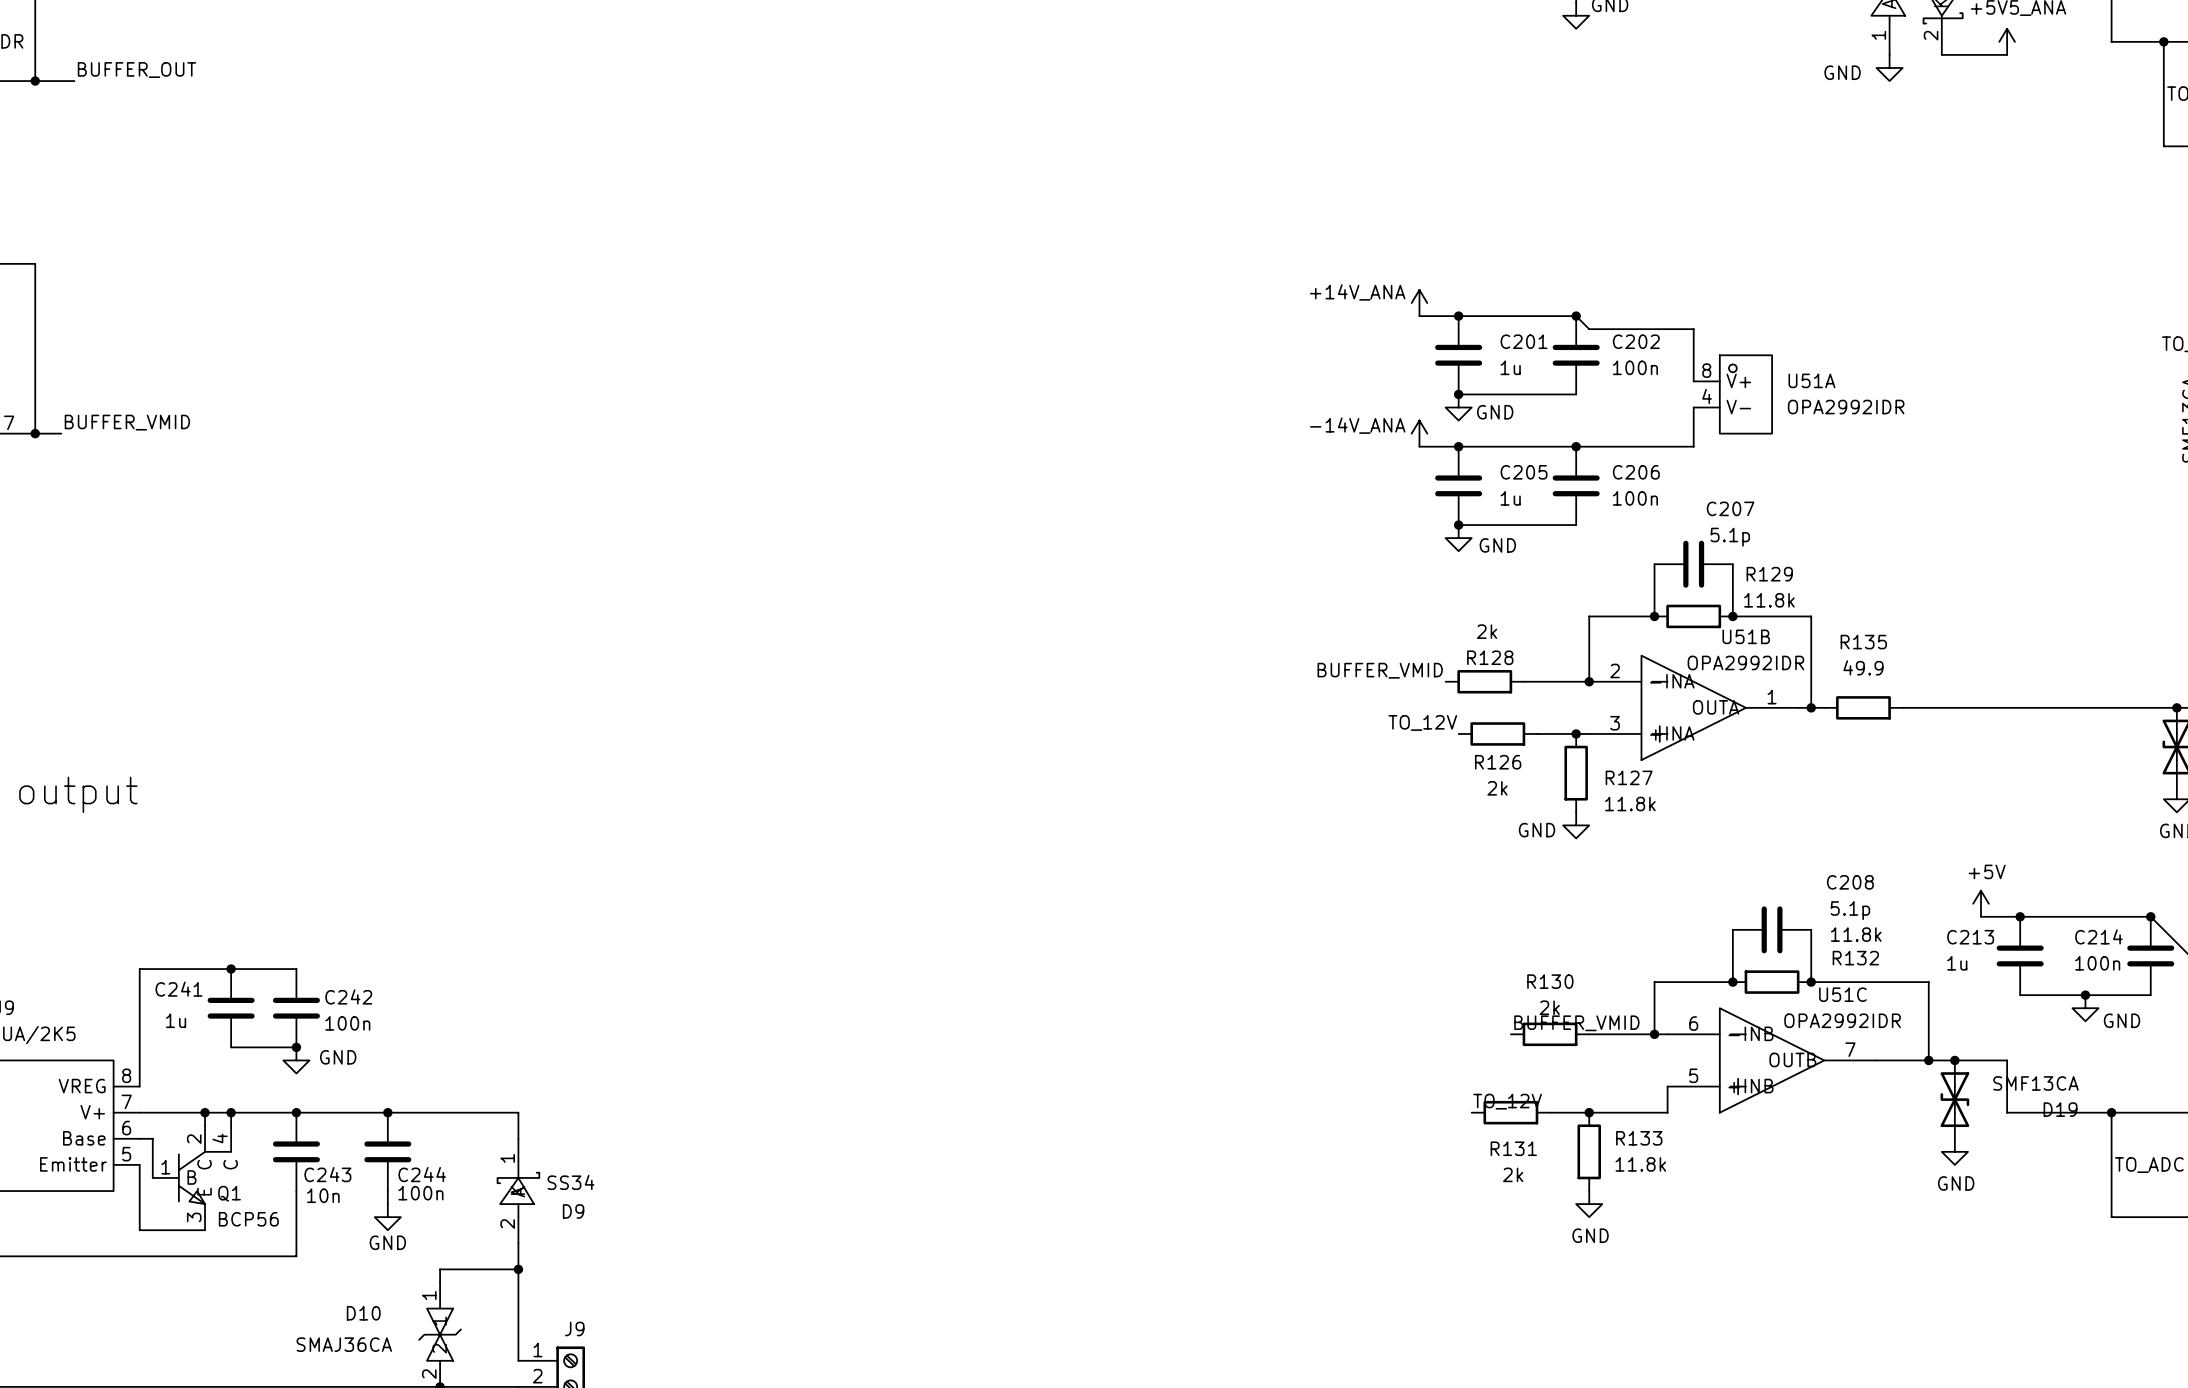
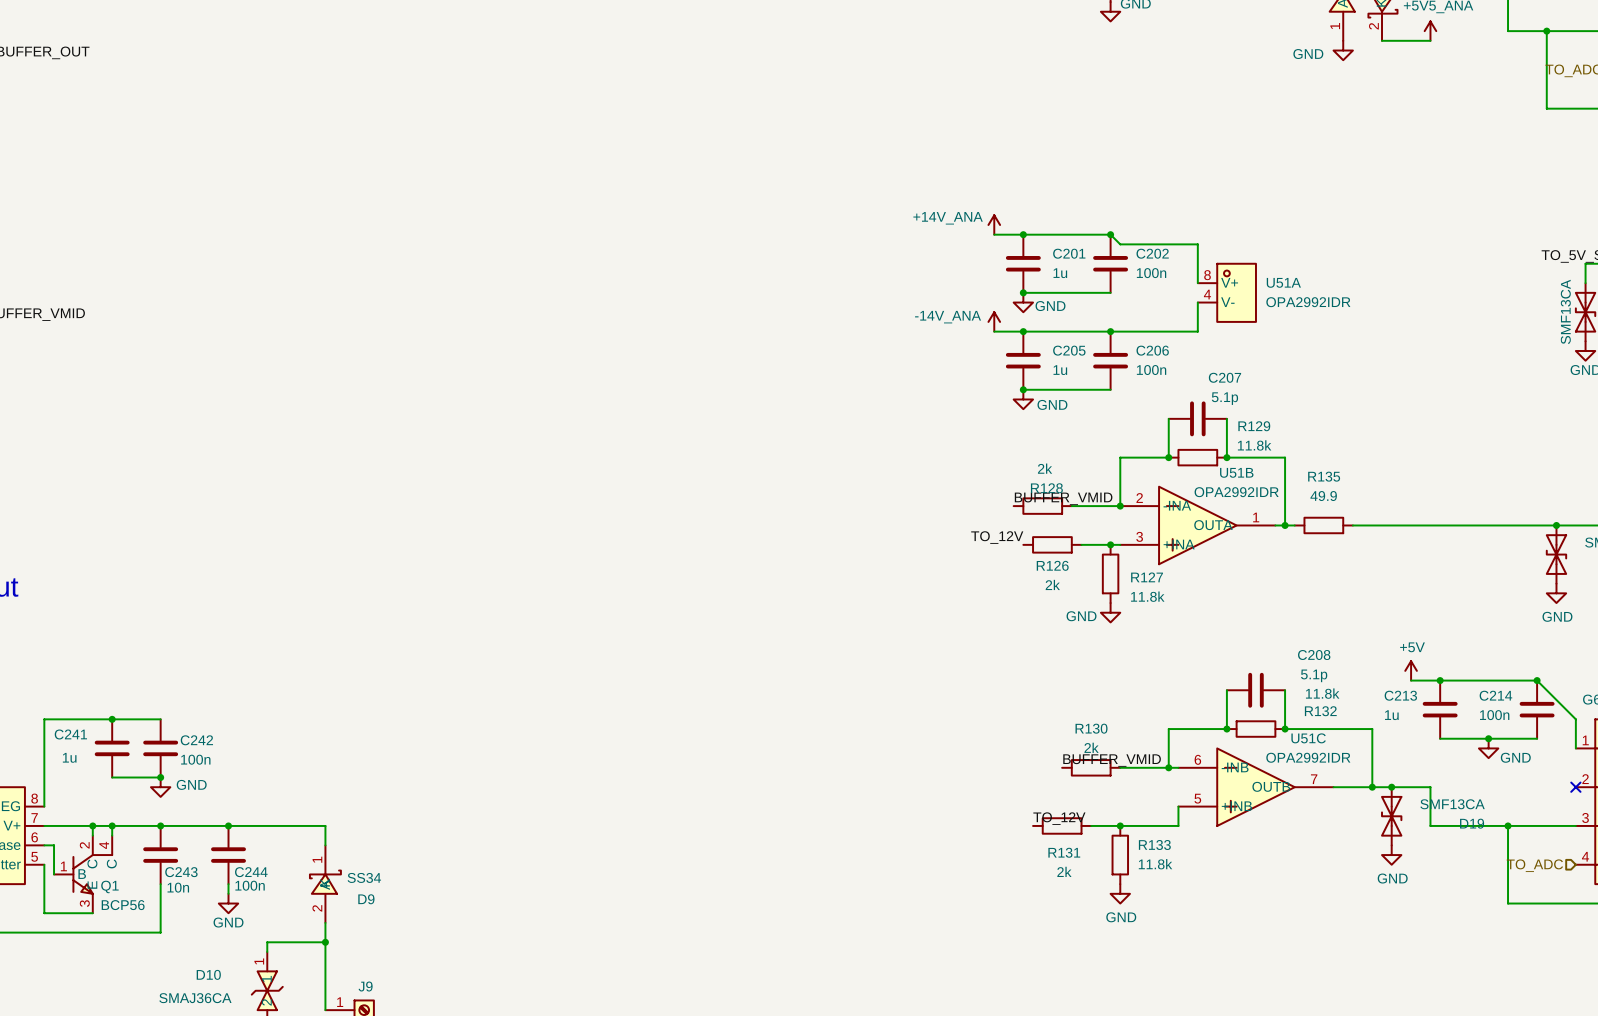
label position: BUFFER_VMID (1380, 670) -> BUFFER_VMID (1063, 498)

